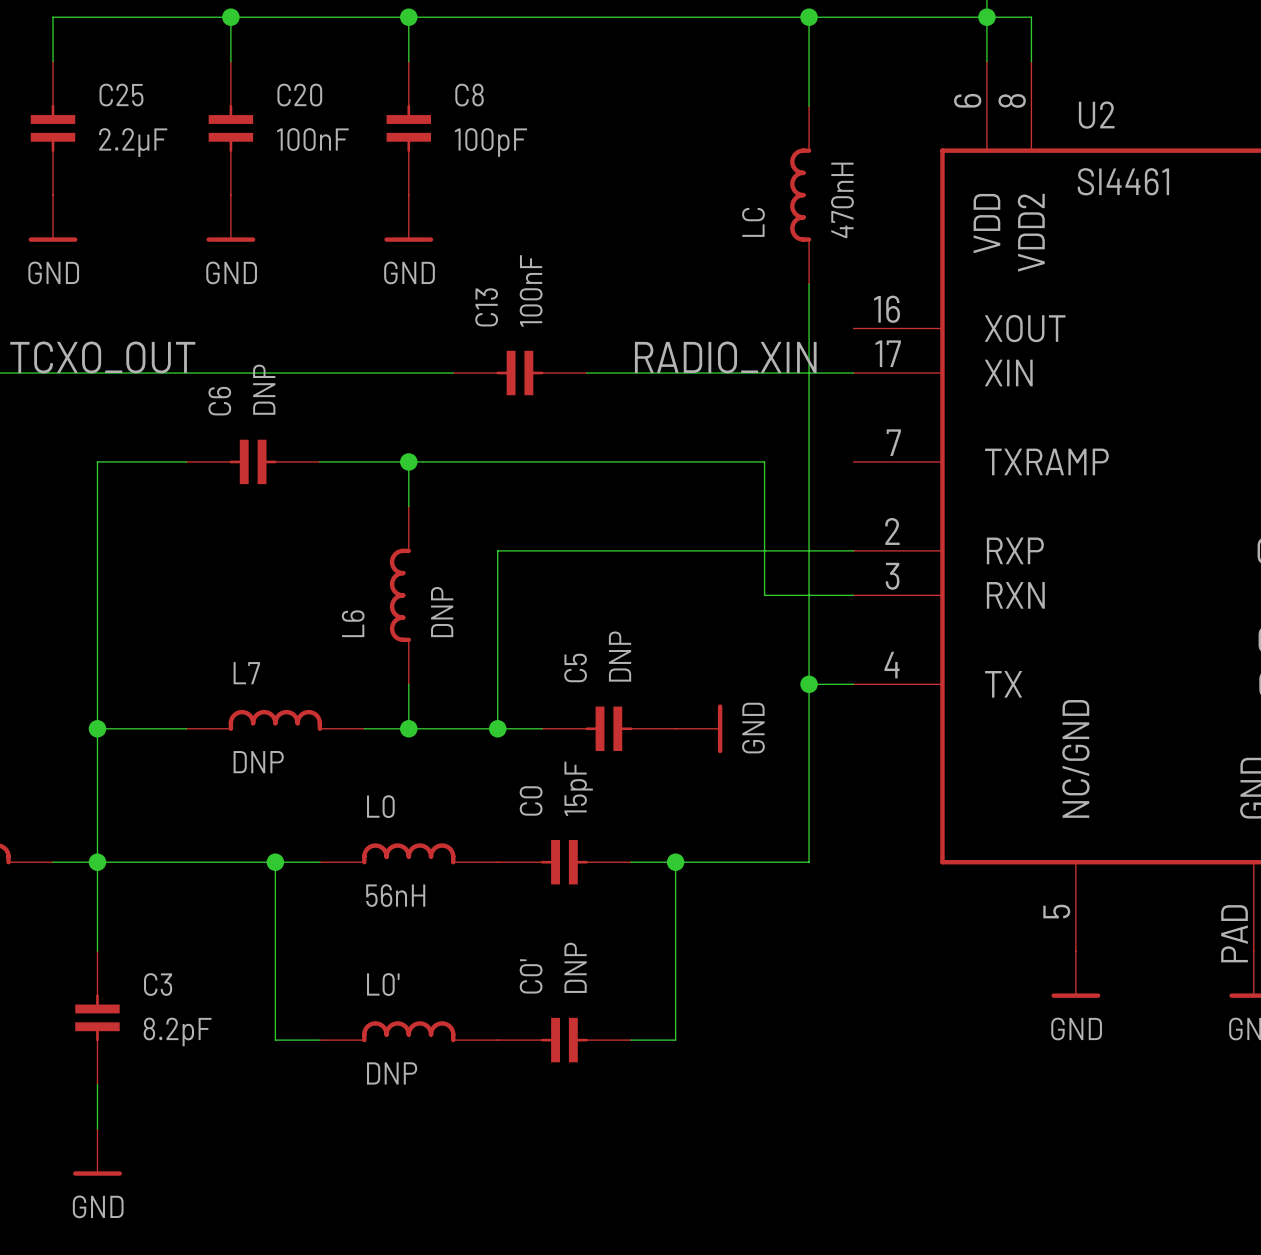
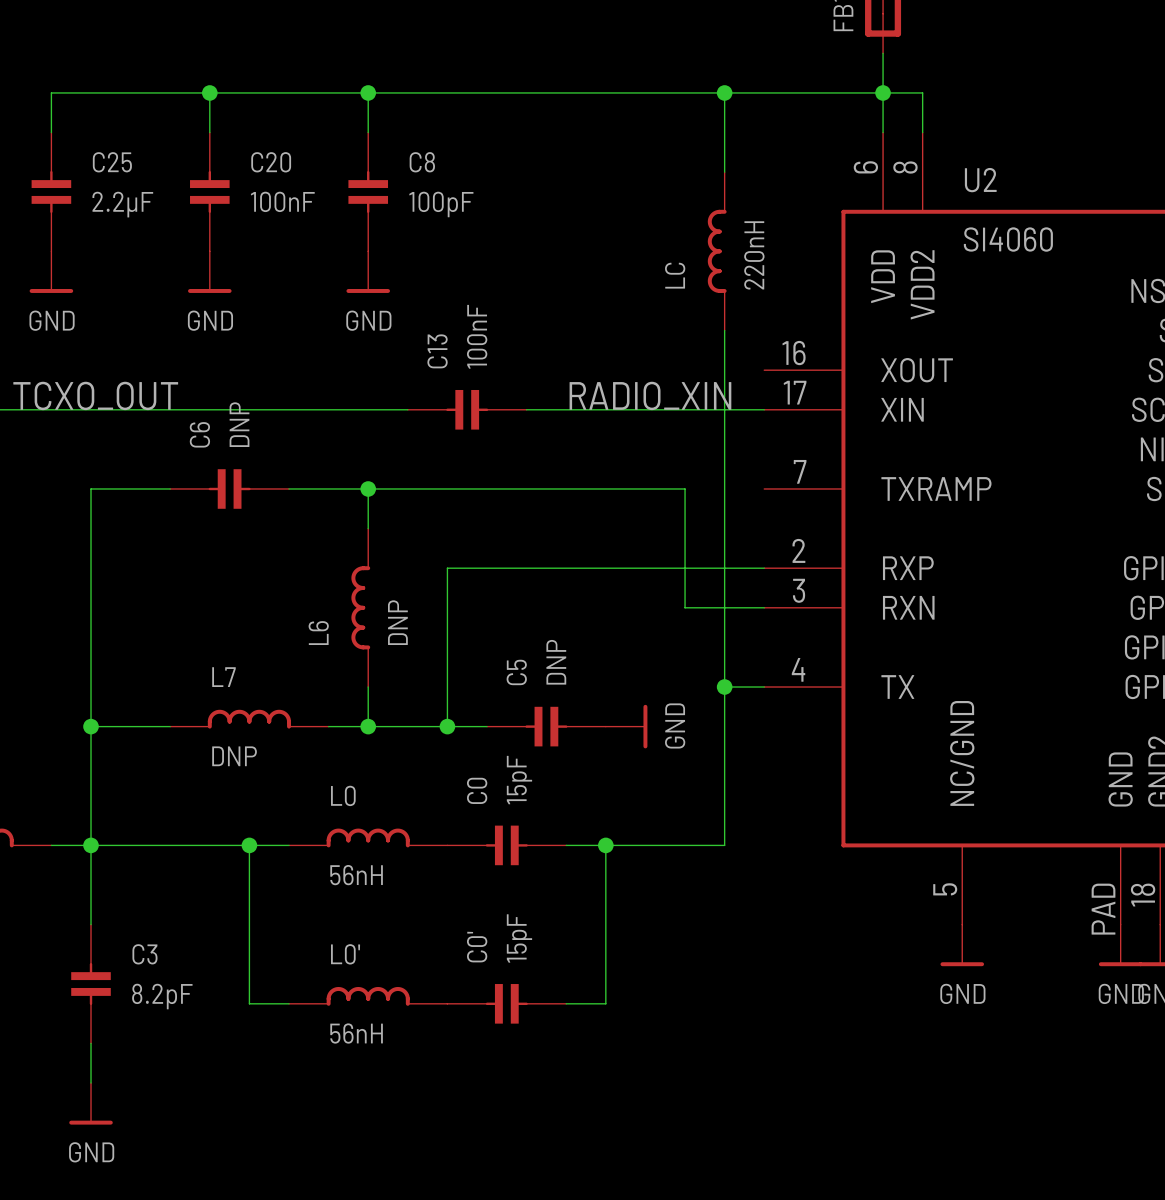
U2 value: SI4461 (1123, 181) -> SI4060 (1008, 239)
LC value: 470nH (842, 200) -> 220nH (754, 255)
C0' value: DNP (575, 967) -> 15pF (519, 938)
L0' value: DNP (392, 1073) -> 56nH (356, 1033)

